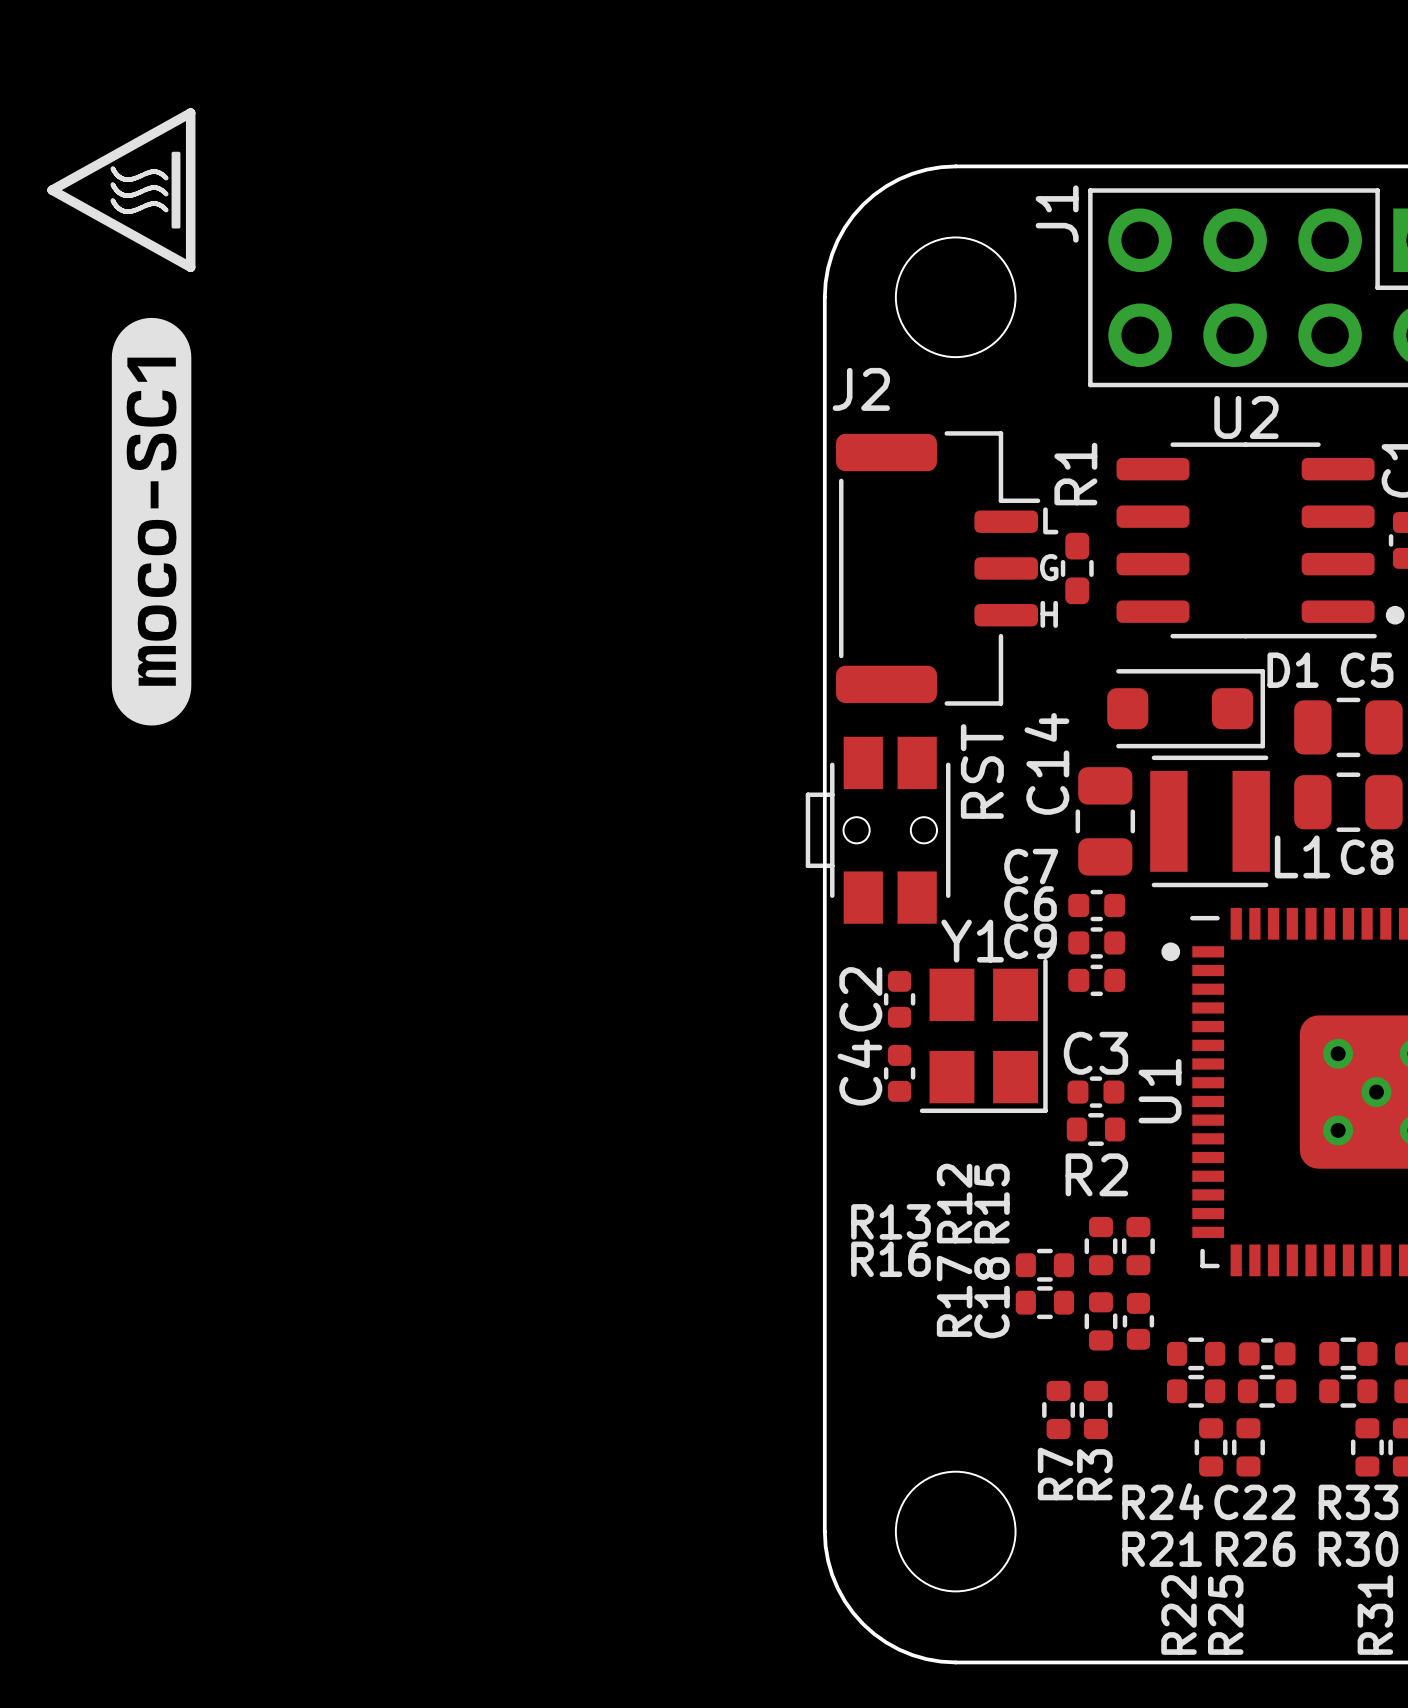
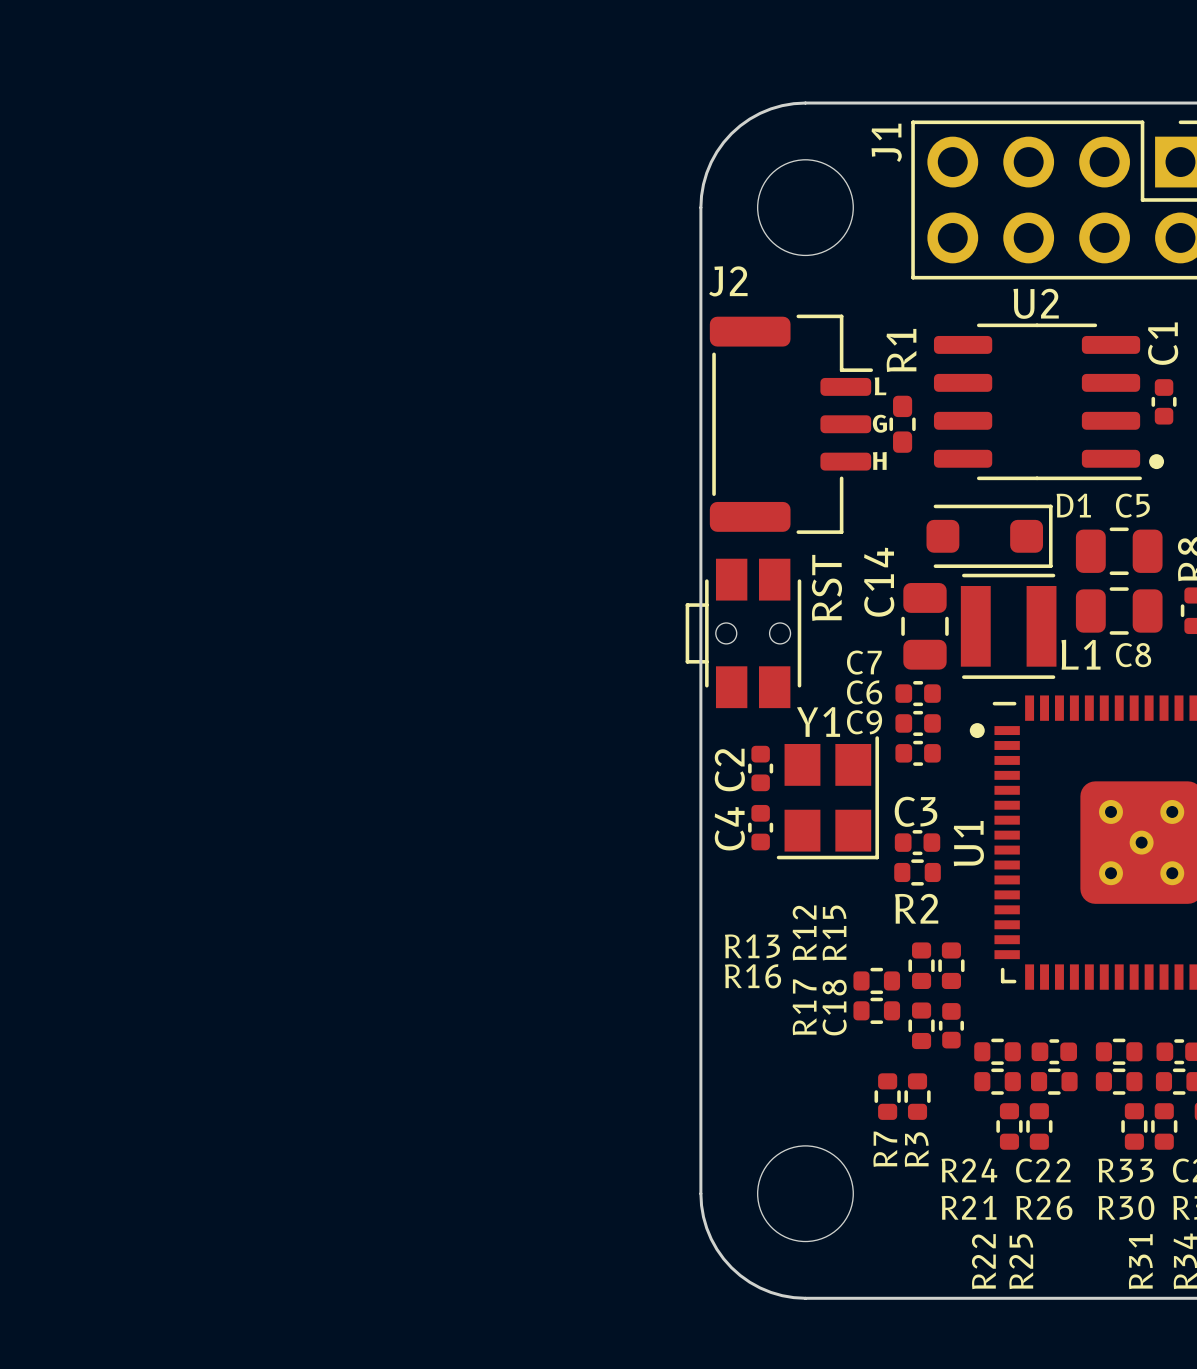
line: (190, 112) (190, 267) (52, 190) (190, 112) -> none
drawing: [171, 151, 181, 229] -> none
line: (113, 169) (118, 176) (125, 179) (133, 178) (153, 171) (159, 172) (166, 178) -> none
line: (113, 185) (118, 192) (125, 195) (133, 194) (153, 187) (159, 188) (166, 194) -> none
line: (113, 201) (118, 208) (125, 211) (133, 210) (153, 203) (159, 204) (166, 210) -> none
drawing: [111, 317, 192, 726] -> none

